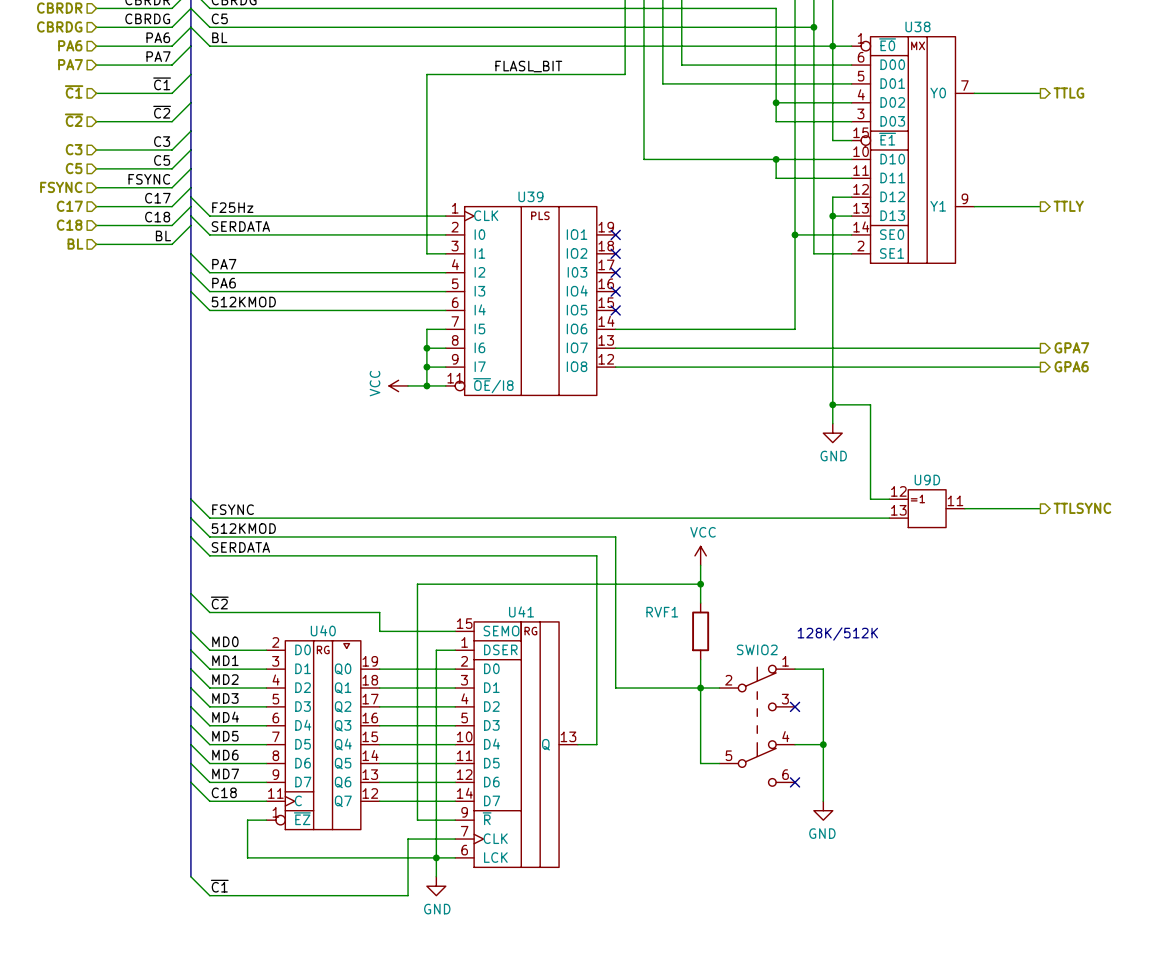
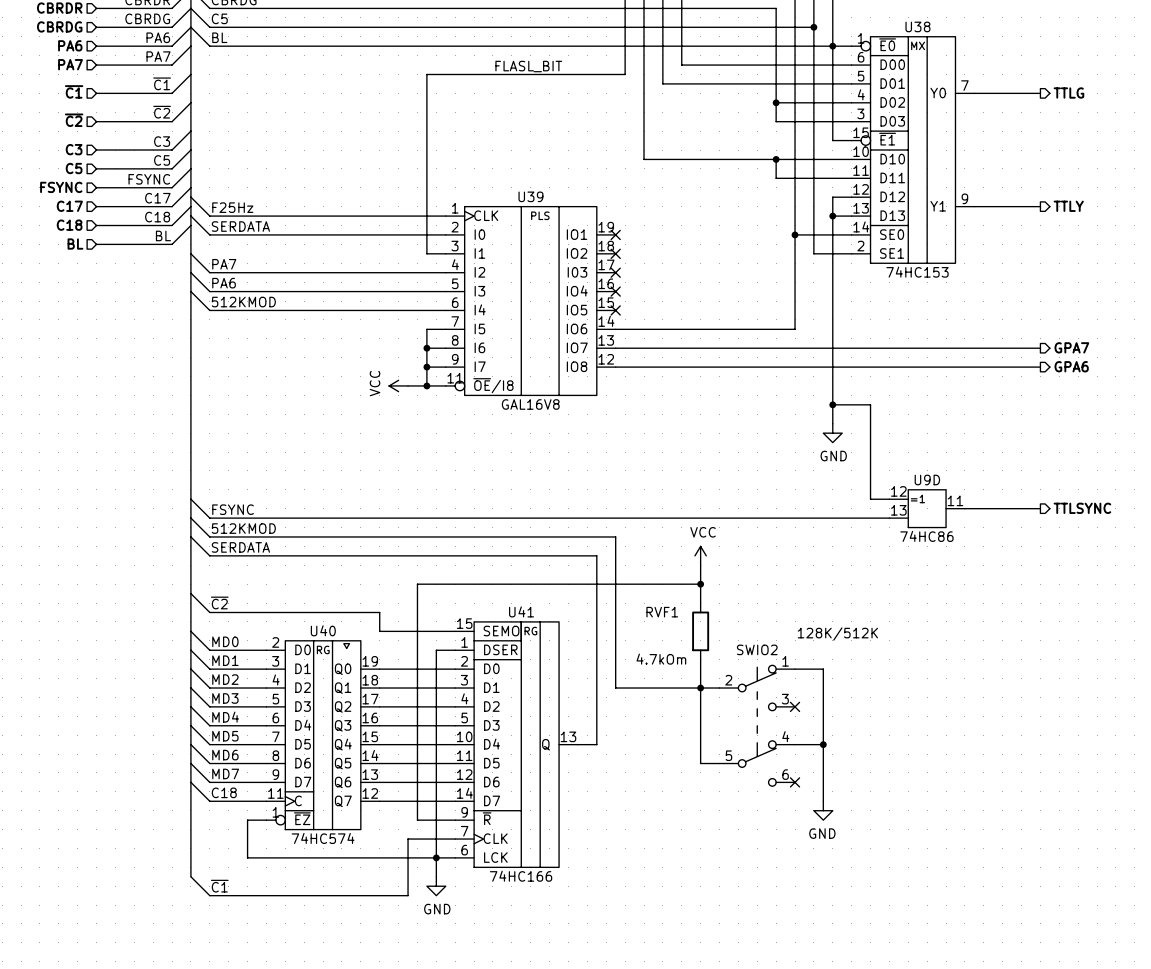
U38 value: none -> 74HC153 (917, 272)
U39 value: none -> GAL16V8 (530, 404)
U9D value: none -> 74HC86 (926, 536)
RVF1 value: none -> 4.7kOm (661, 659)
U40 value: none -> 74HC574 (323, 838)
U41 value: none -> 74HC166 (521, 876)

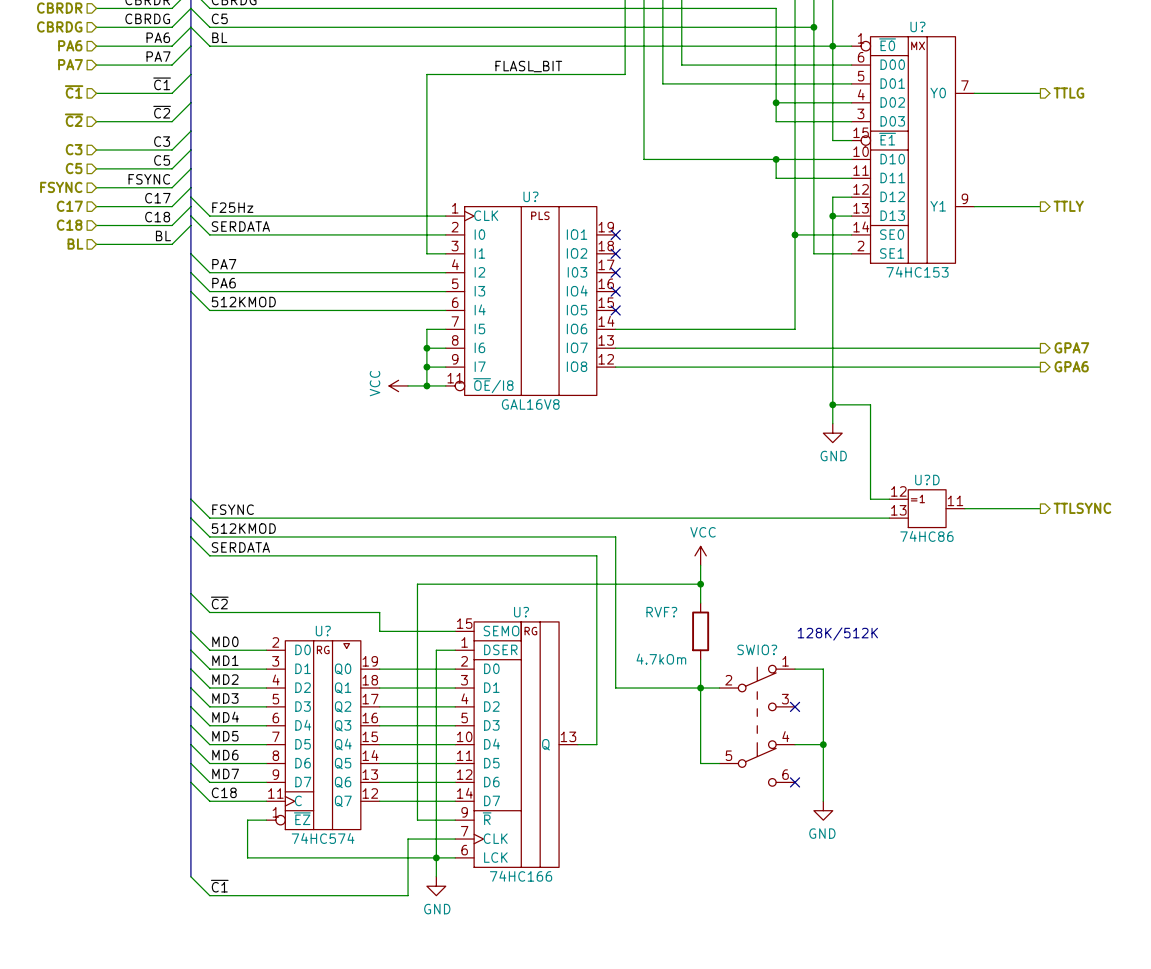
U38 name: U38 (917, 26) -> U? (917, 26)
U39 name: U39 (530, 196) -> U? (530, 196)
U9D name: U9D (927, 480) -> U?D (927, 480)
U41 name: U41 (521, 611) -> U? (521, 612)
RVF1 name: RVF1 (662, 612) -> RVF? (661, 612)
U40 name: U40 (323, 630) -> U? (323, 631)
SWIO2 name: SWIO2 (757, 649) -> SWIO? (757, 649)

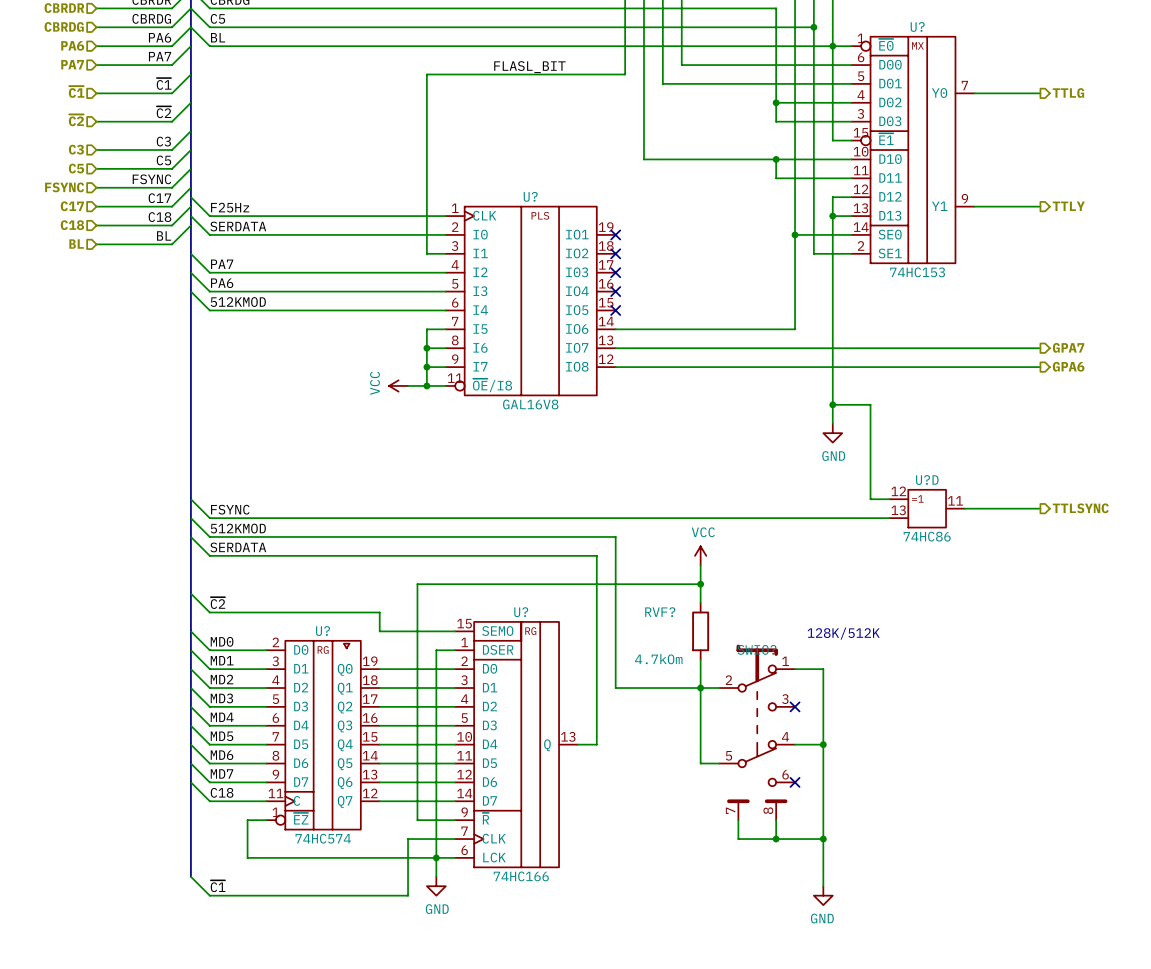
SWIO? symbol: [719, 665, 796, 787] -> [719, 644, 796, 821]
wire: none -> (823, 801) (823, 886)
power symbol position: GND (823, 810) -> GND (823, 895)
wire: none -> (738, 820) (738, 839) (823, 839)
wire: none -> (776, 820) (776, 839)
junction: none -> (776, 839)
junction: none -> (823, 839)

